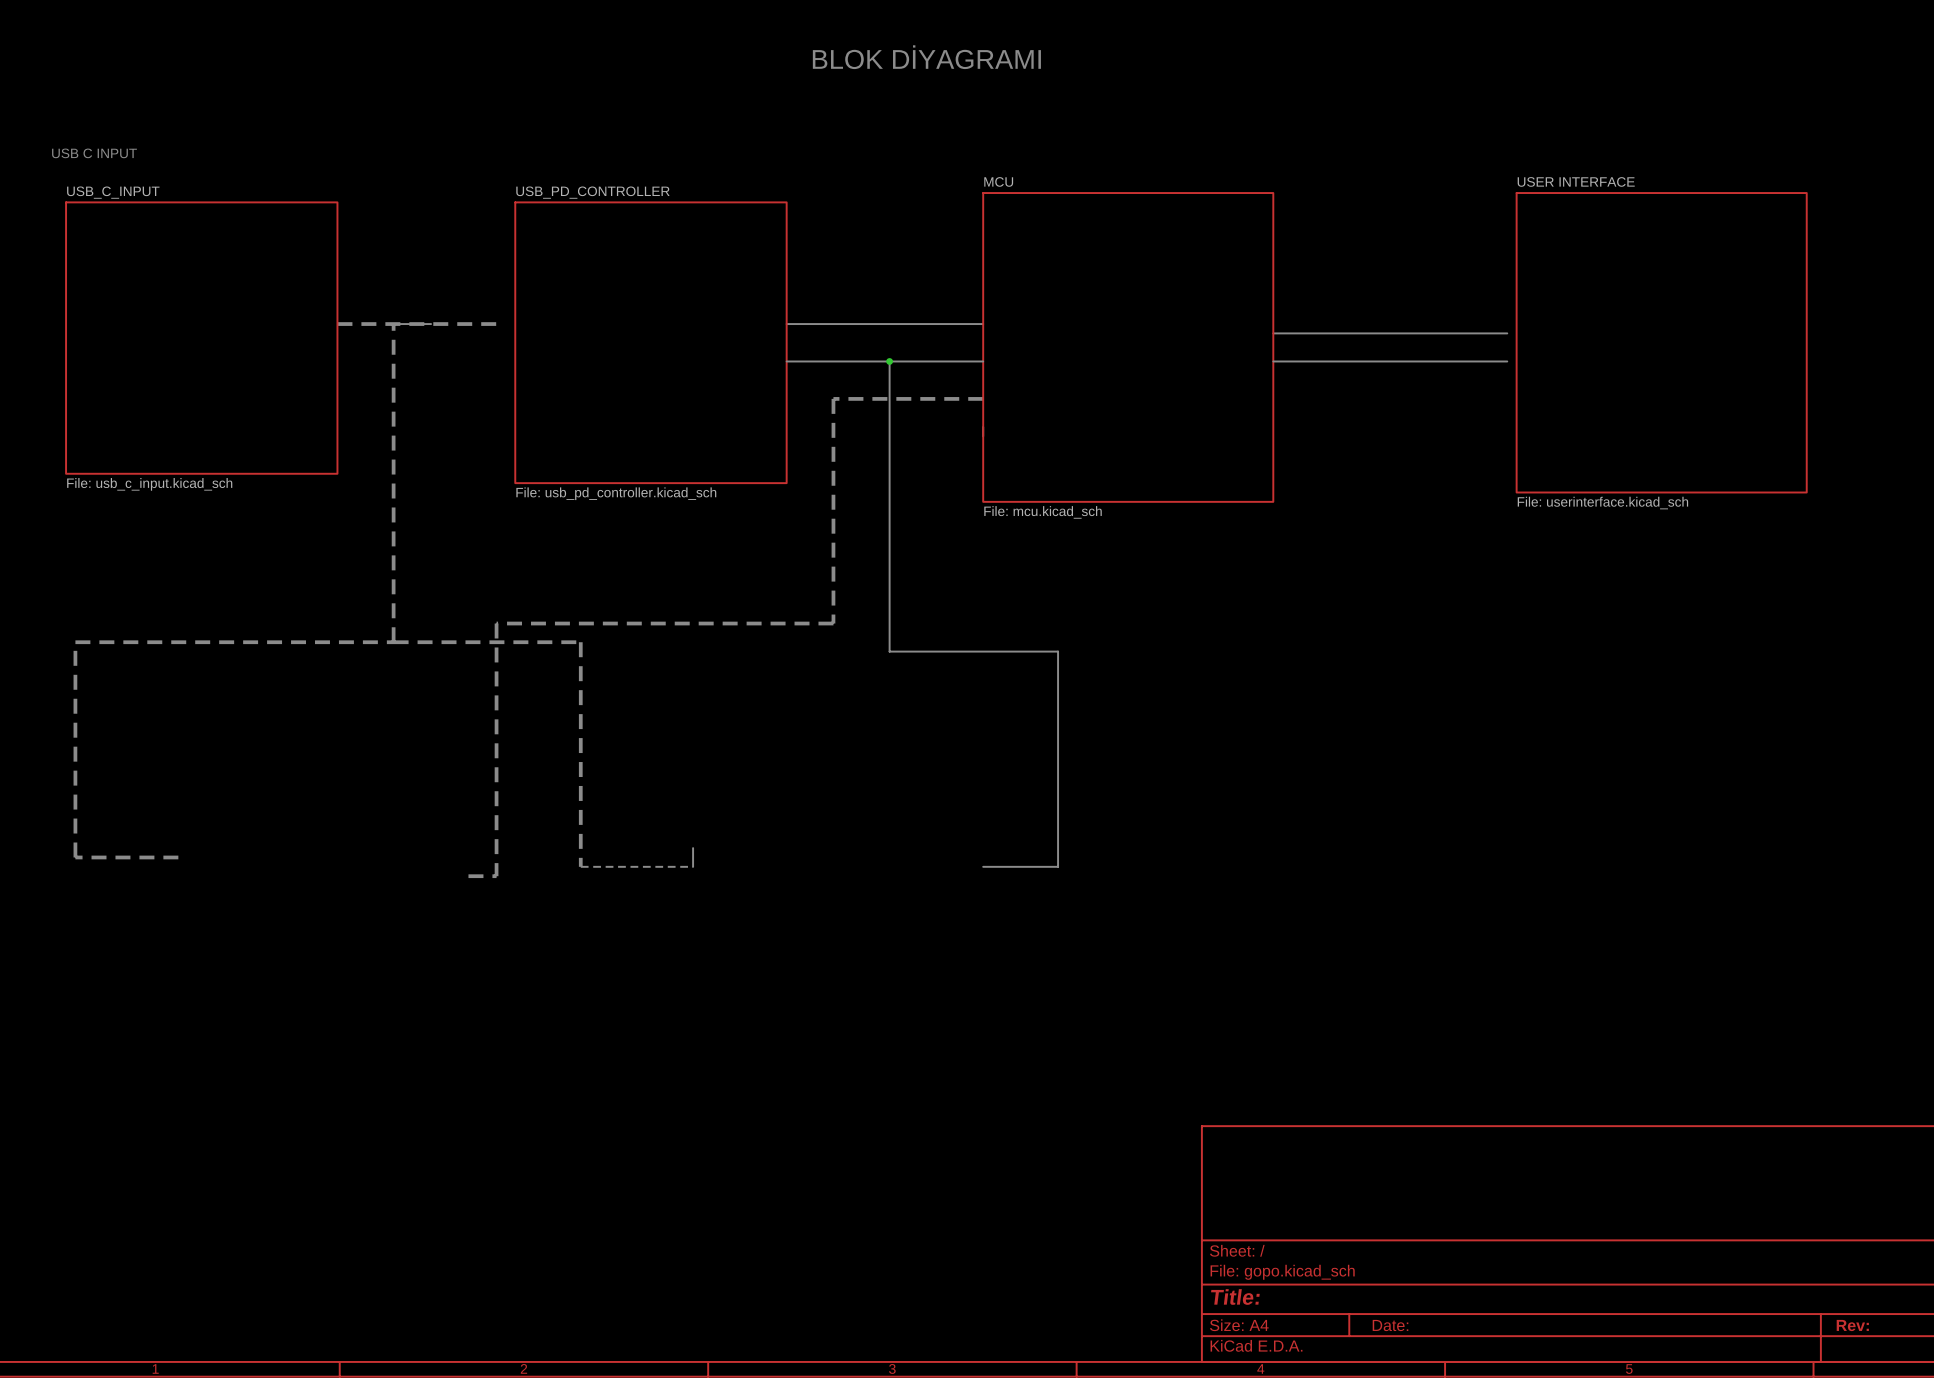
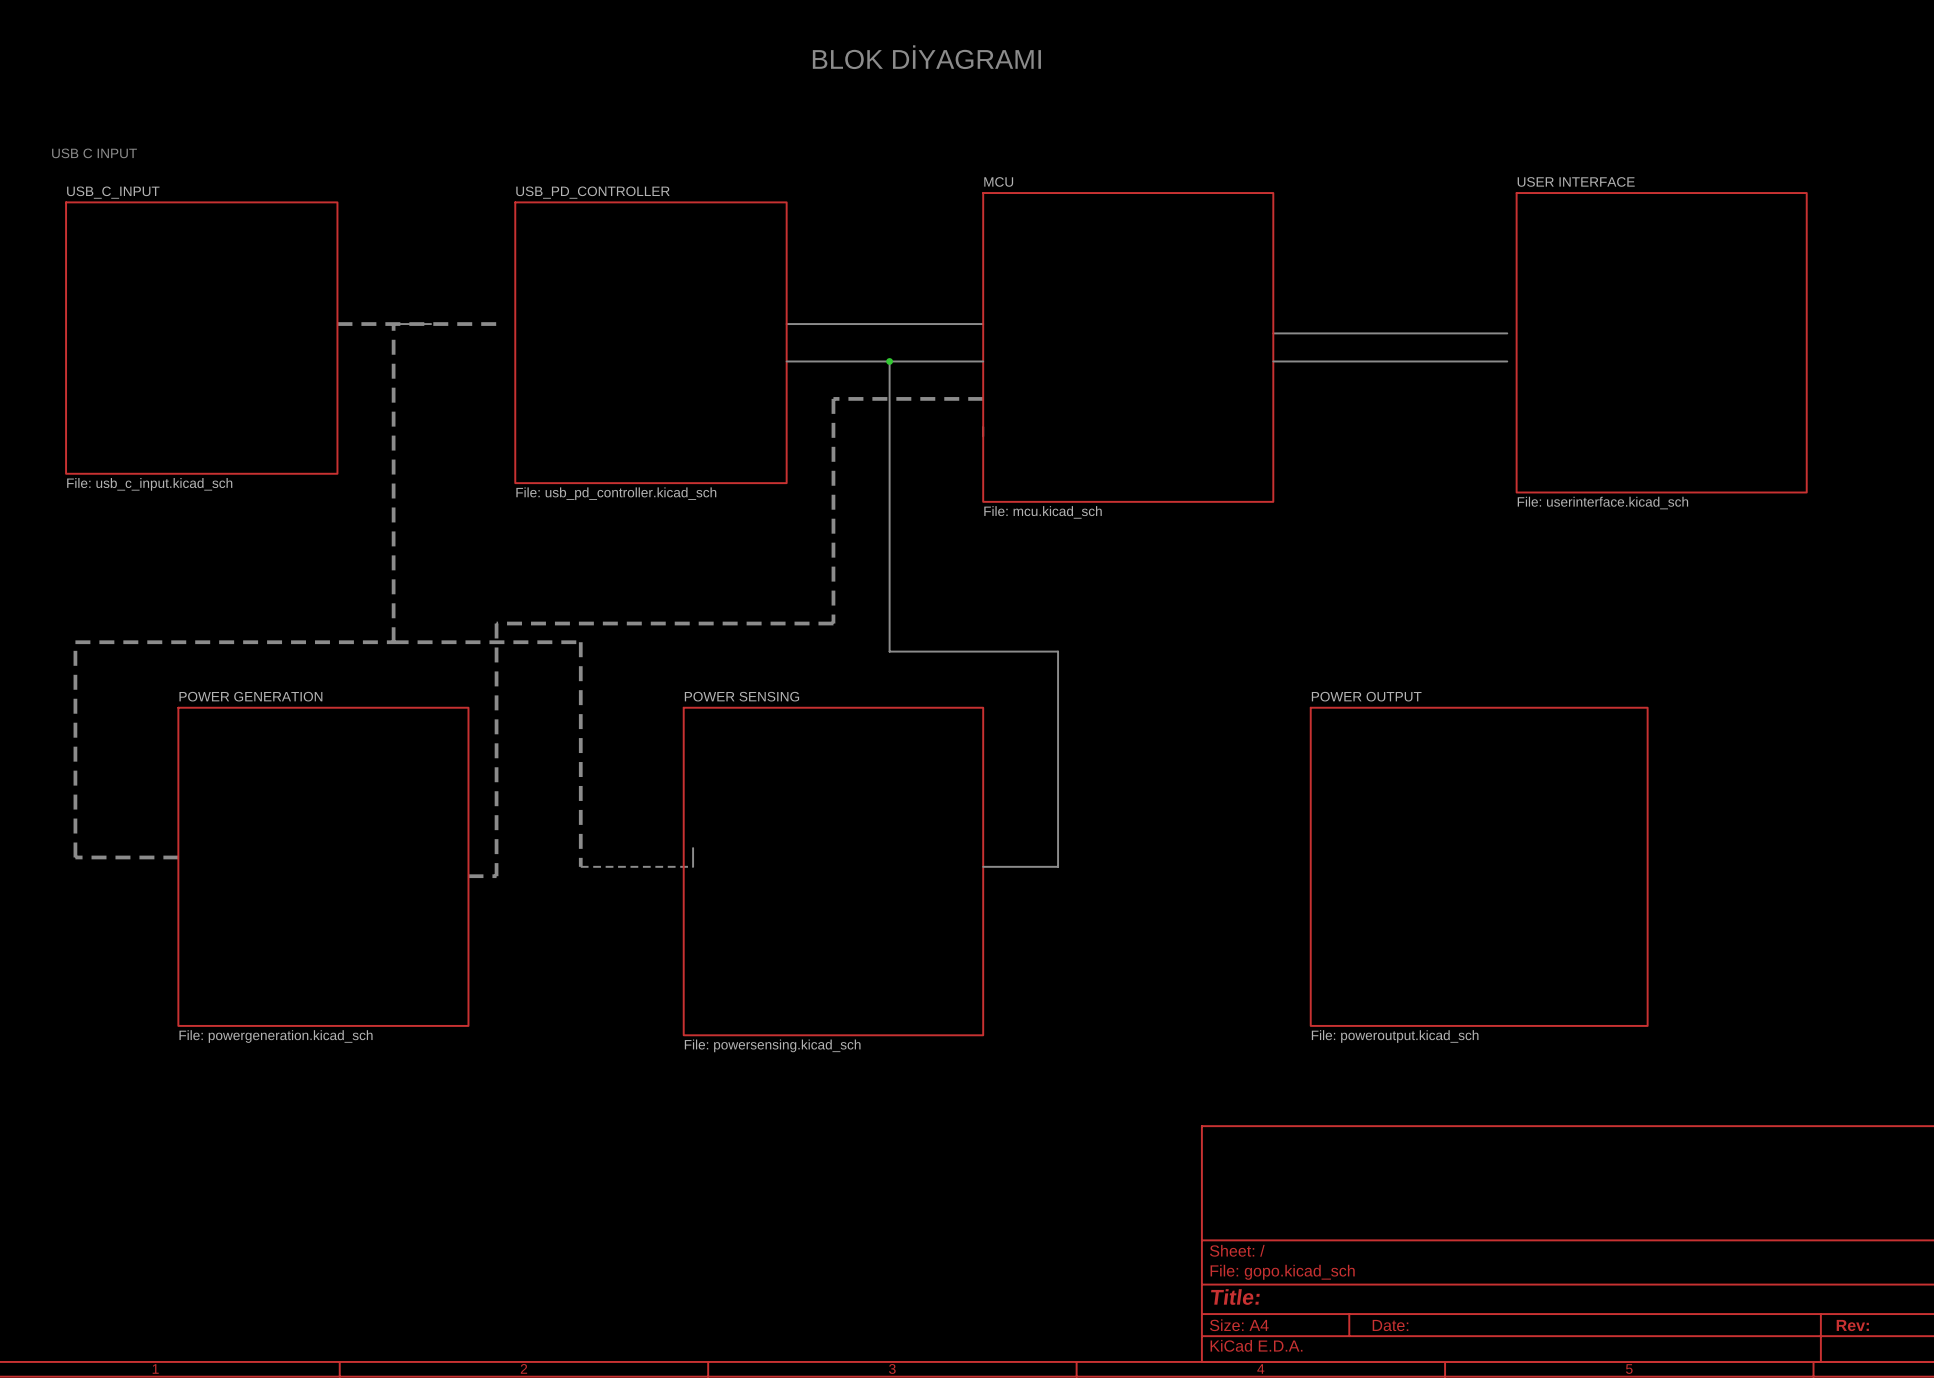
sheet POWER GENERATION: none -> File: powergeneration.kicad_sch (323, 866)
sheet POWER OUTPUT: none -> File: poweroutput.kicad_sch (1479, 866)
sheet POWER SENSING: none -> File: powersensing.kicad_sch (833, 871)

